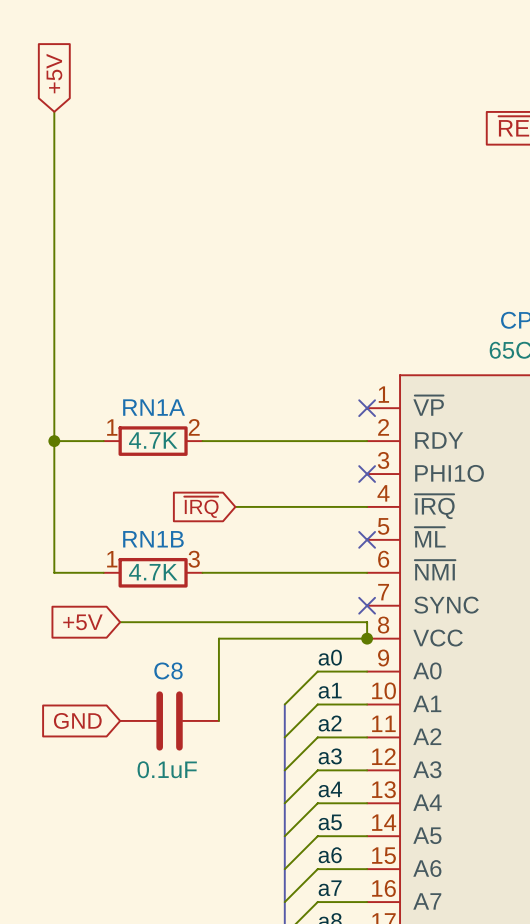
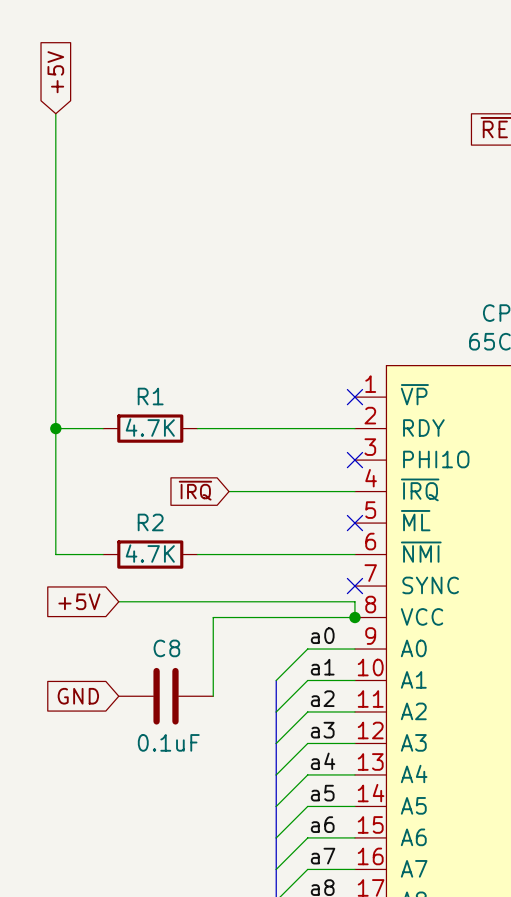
RN1A name: RN1A (154, 407) -> R1 (150, 396)
RN1A pin number: 1 (112, 427) -> none
RN1A pin number: 2 (194, 427) -> none
RN1B name: RN1B (153, 539) -> R2 (150, 522)
RN1B pin number: 1 (112, 559) -> none
RN1B pin number: 3 (194, 559) -> none

